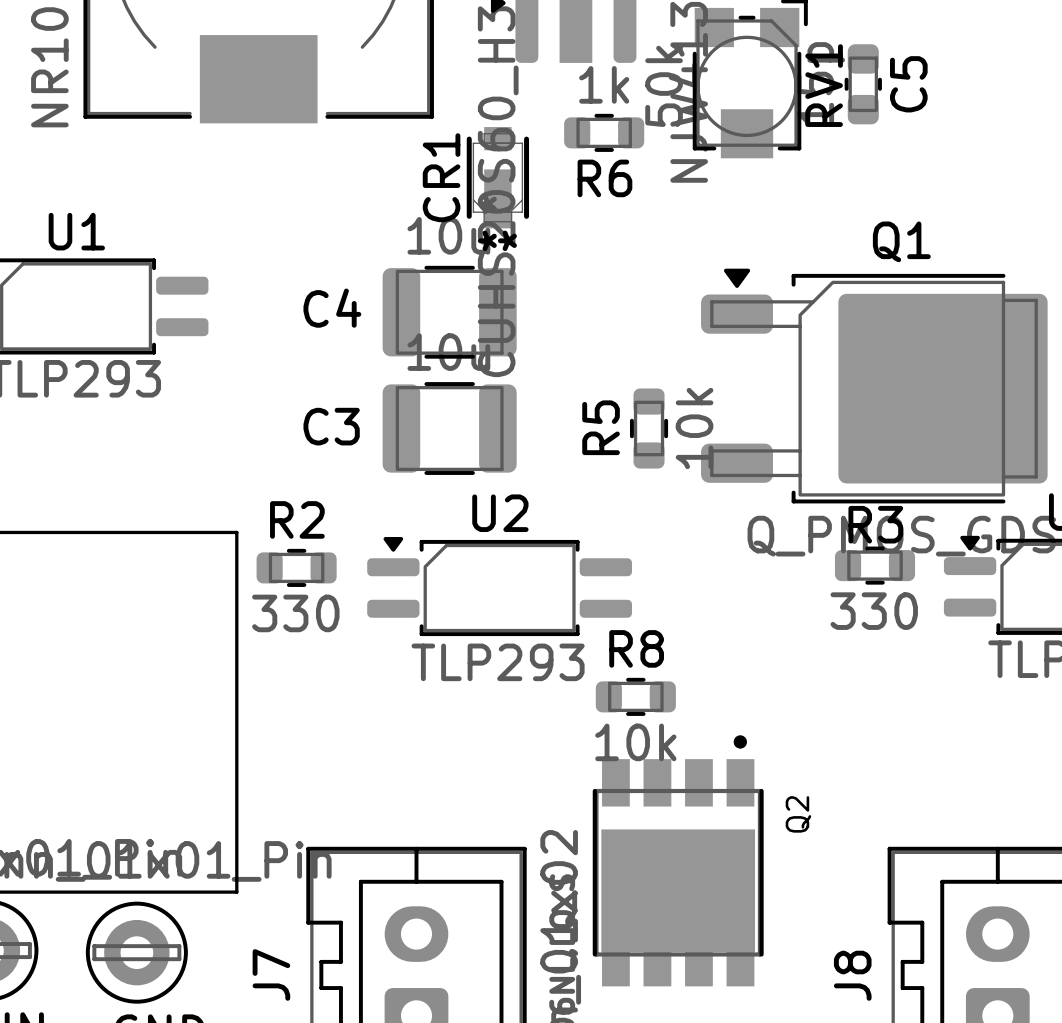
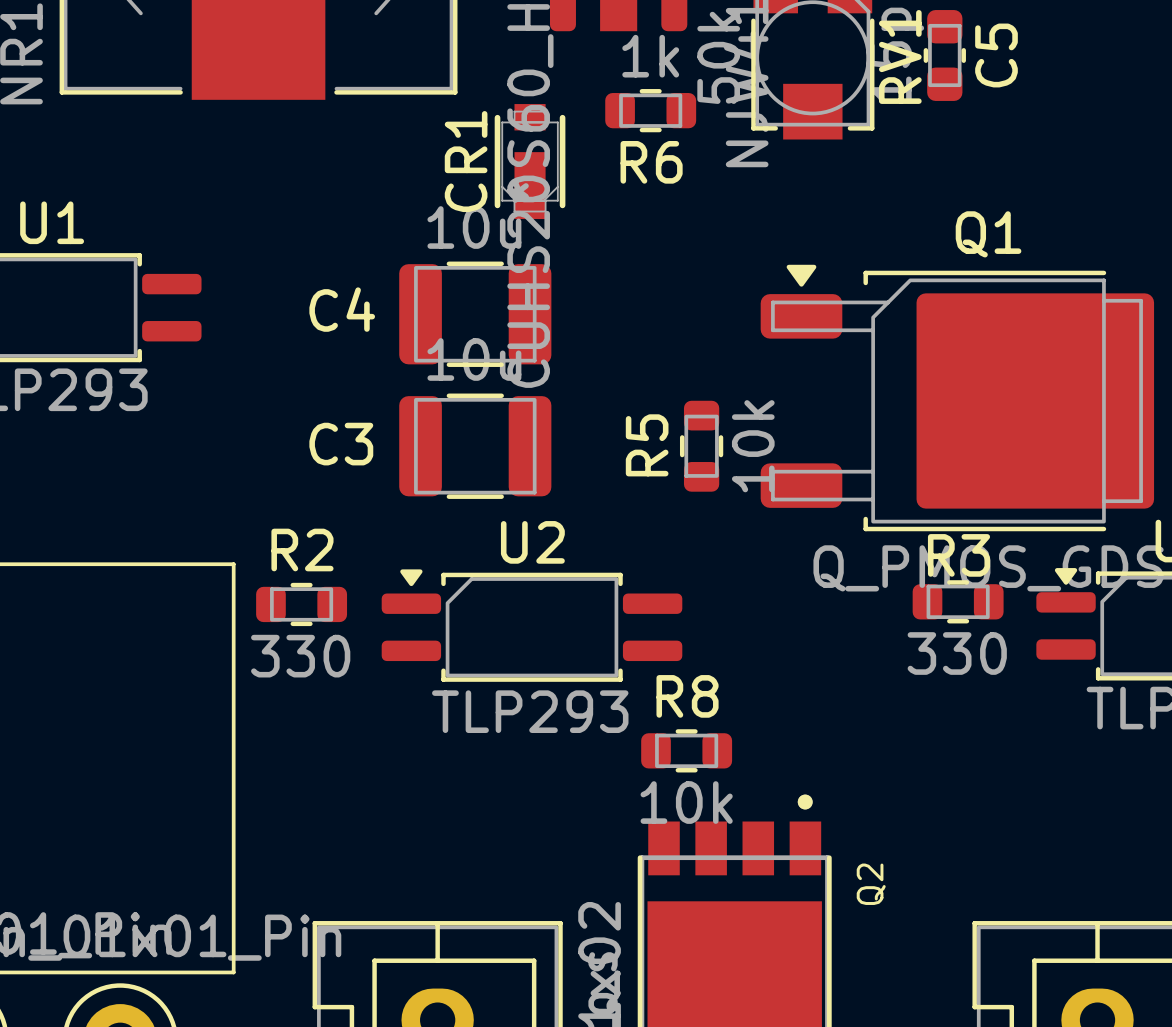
CR1 text: * (487, 240) -> none
CR1 text: * (507, 240) -> none

